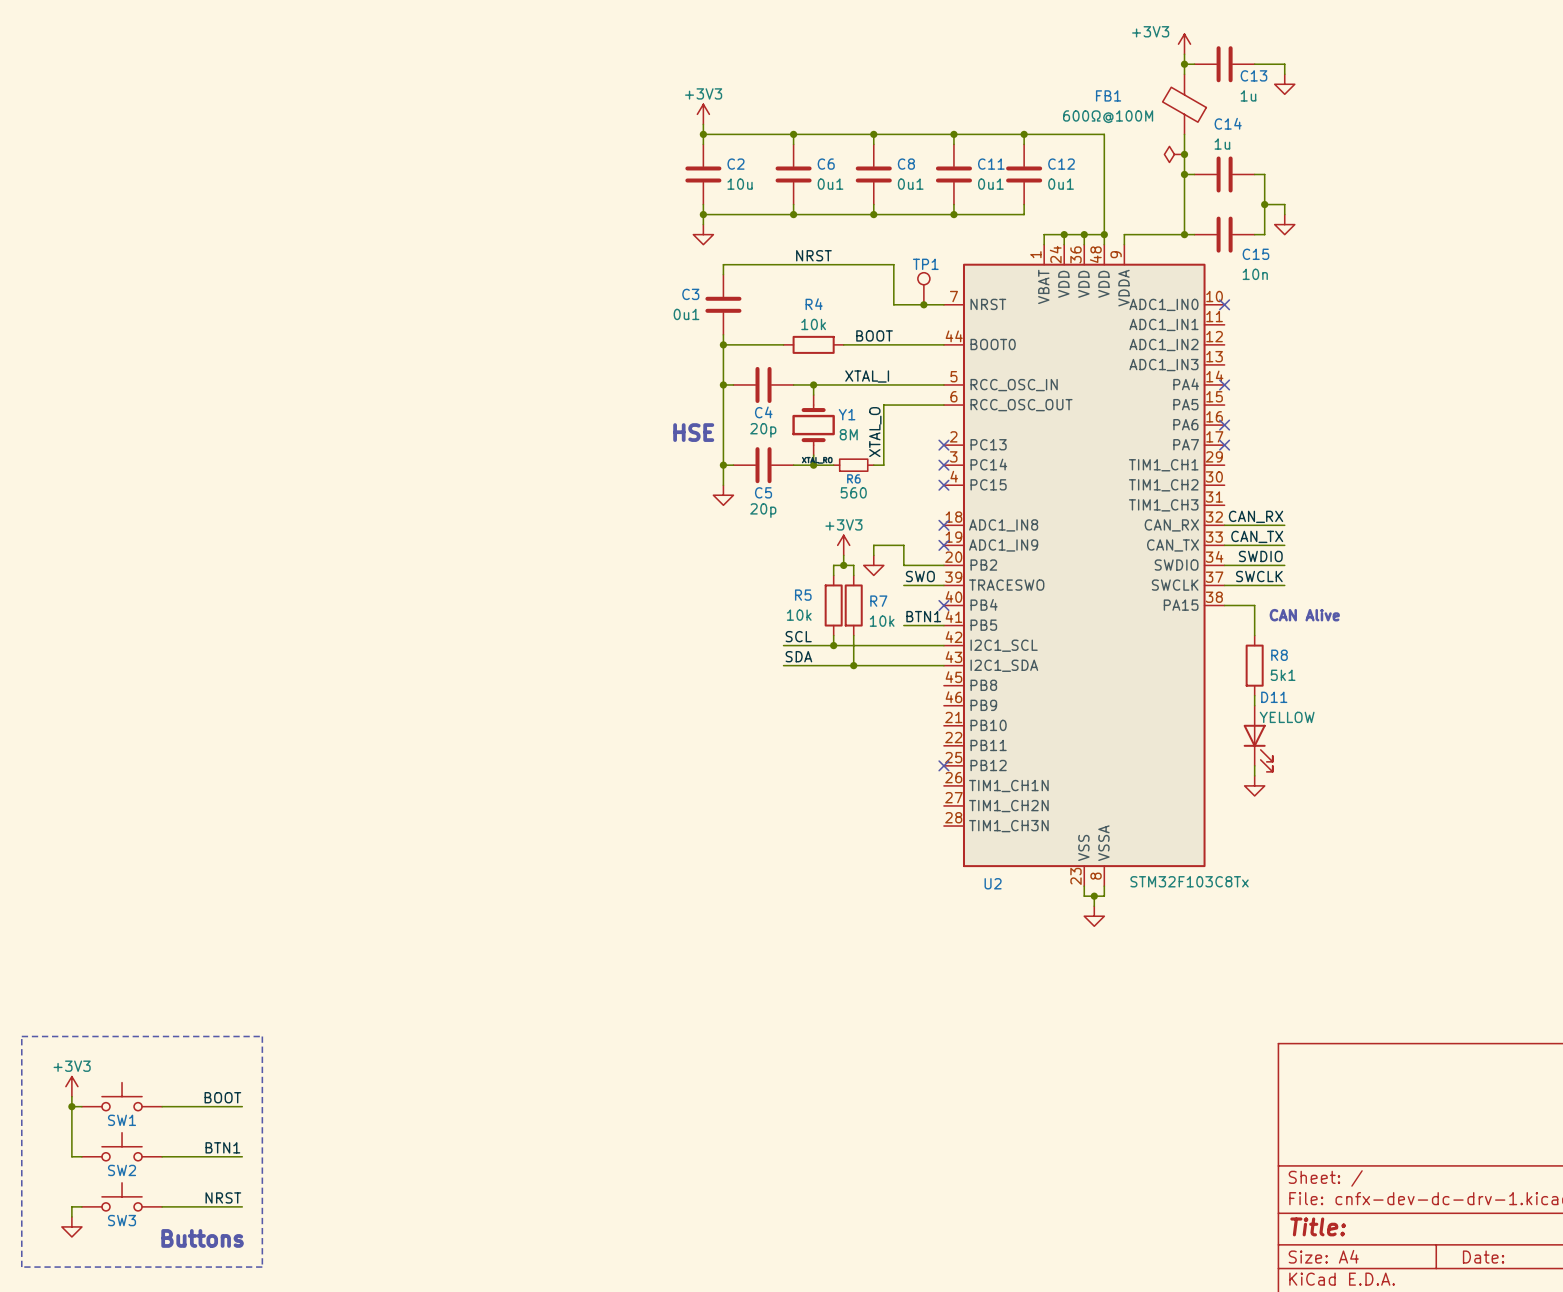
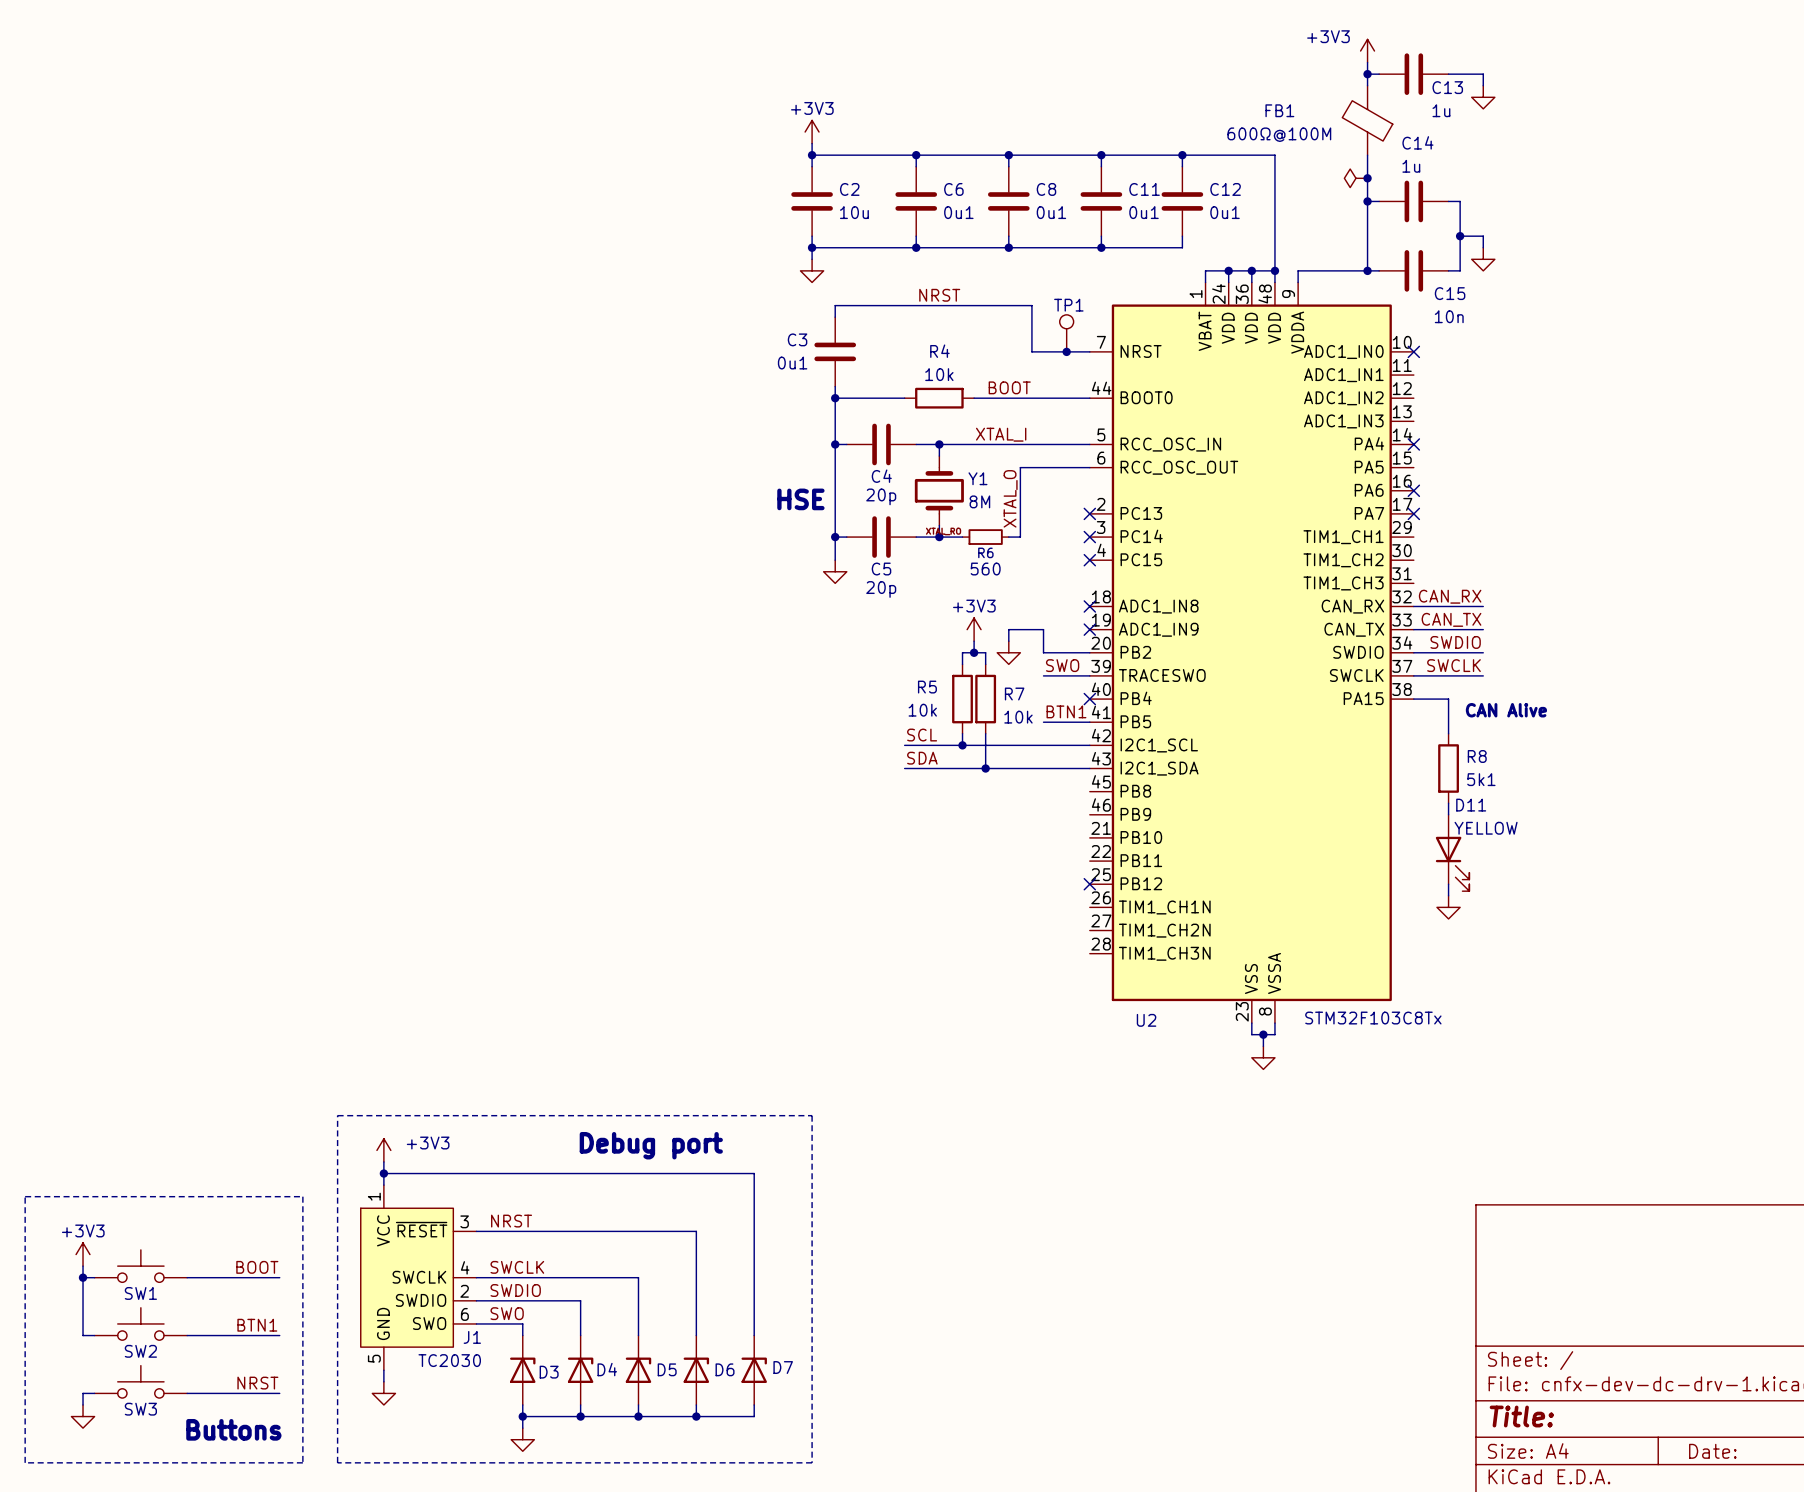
line: none -> (337, 1115) (812, 1115) (812, 1462) (337, 1462) (337, 1115)
text: none -> Debug port (651, 1145)
power symbol: none -> +3V3 (383, 1150)
wire: none -> (383, 1161) (383, 1185)
wire: none -> (383, 1173) (754, 1173) (754, 1335)
junction: none -> (383, 1173)
label: none -> NRST (511, 1221)
wire: none -> (476, 1231) (696, 1231) (696, 1335)
label: none -> SWCLK (517, 1267)
J1: none -> TC2030 (418, 1277)
wire: none -> (476, 1277) (638, 1277) (638, 1335)
label: none -> SWDIO (515, 1290)
wire: none -> (476, 1300) (580, 1300) (580, 1335)
label: none -> SWO (507, 1313)
wire: none -> (476, 1323) (522, 1323) (522, 1335)
wire: none -> (383, 1370) (383, 1381)
D3: none -> (522, 1370)
D4: none -> (580, 1370)
D5: none -> (638, 1370)
D6: none -> (696, 1370)
D7: none -> (754, 1370)
power symbol: none -> (383, 1393)
wire: none -> (522, 1404) (522, 1428)
wire: none -> (580, 1404) (580, 1416)
wire: none -> (638, 1404) (638, 1416)
wire: none -> (696, 1404) (696, 1416)
wire: none -> (754, 1404) (754, 1416) (522, 1416)
junction: none -> (522, 1416)
junction: none -> (580, 1416)
junction: none -> (638, 1416)
junction: none -> (696, 1416)
power symbol: none -> (522, 1439)

